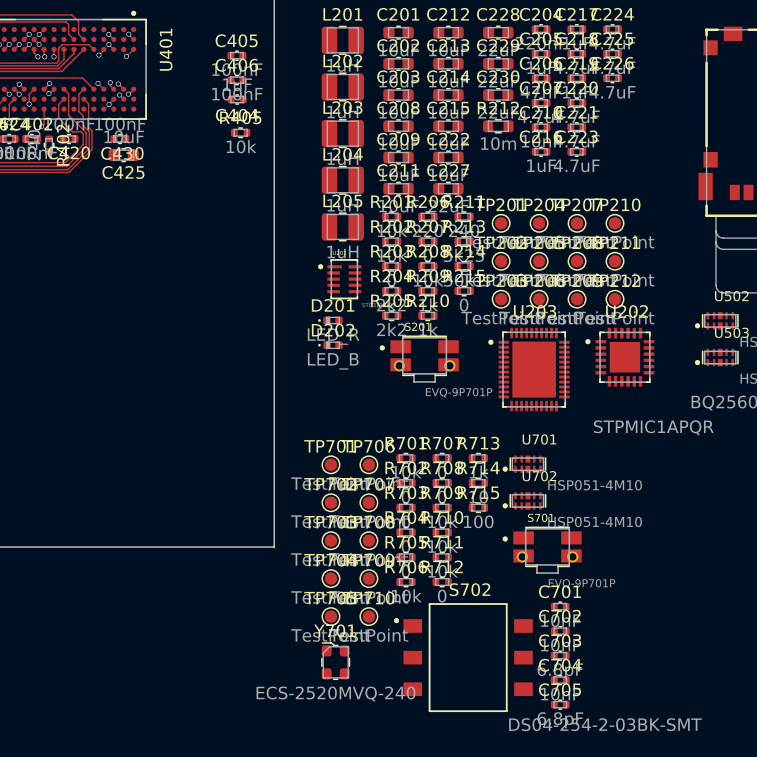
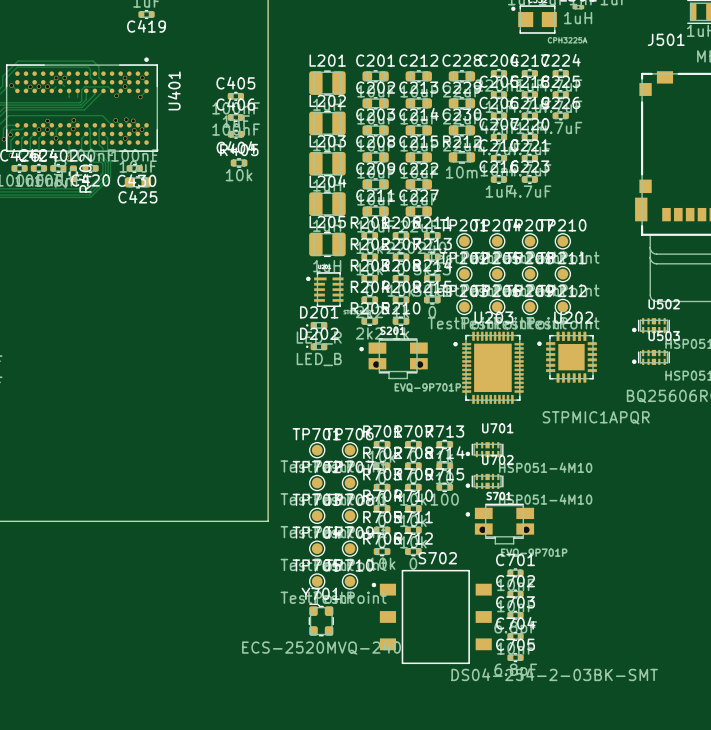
via: (29, 44) -> none
via: (39, 44) -> none
track: (34, 49) (34, 53) (37, 56) -> none
via: (37, 56) -> none
via: (44, 56) -> none
via: (54, 56) -> none

